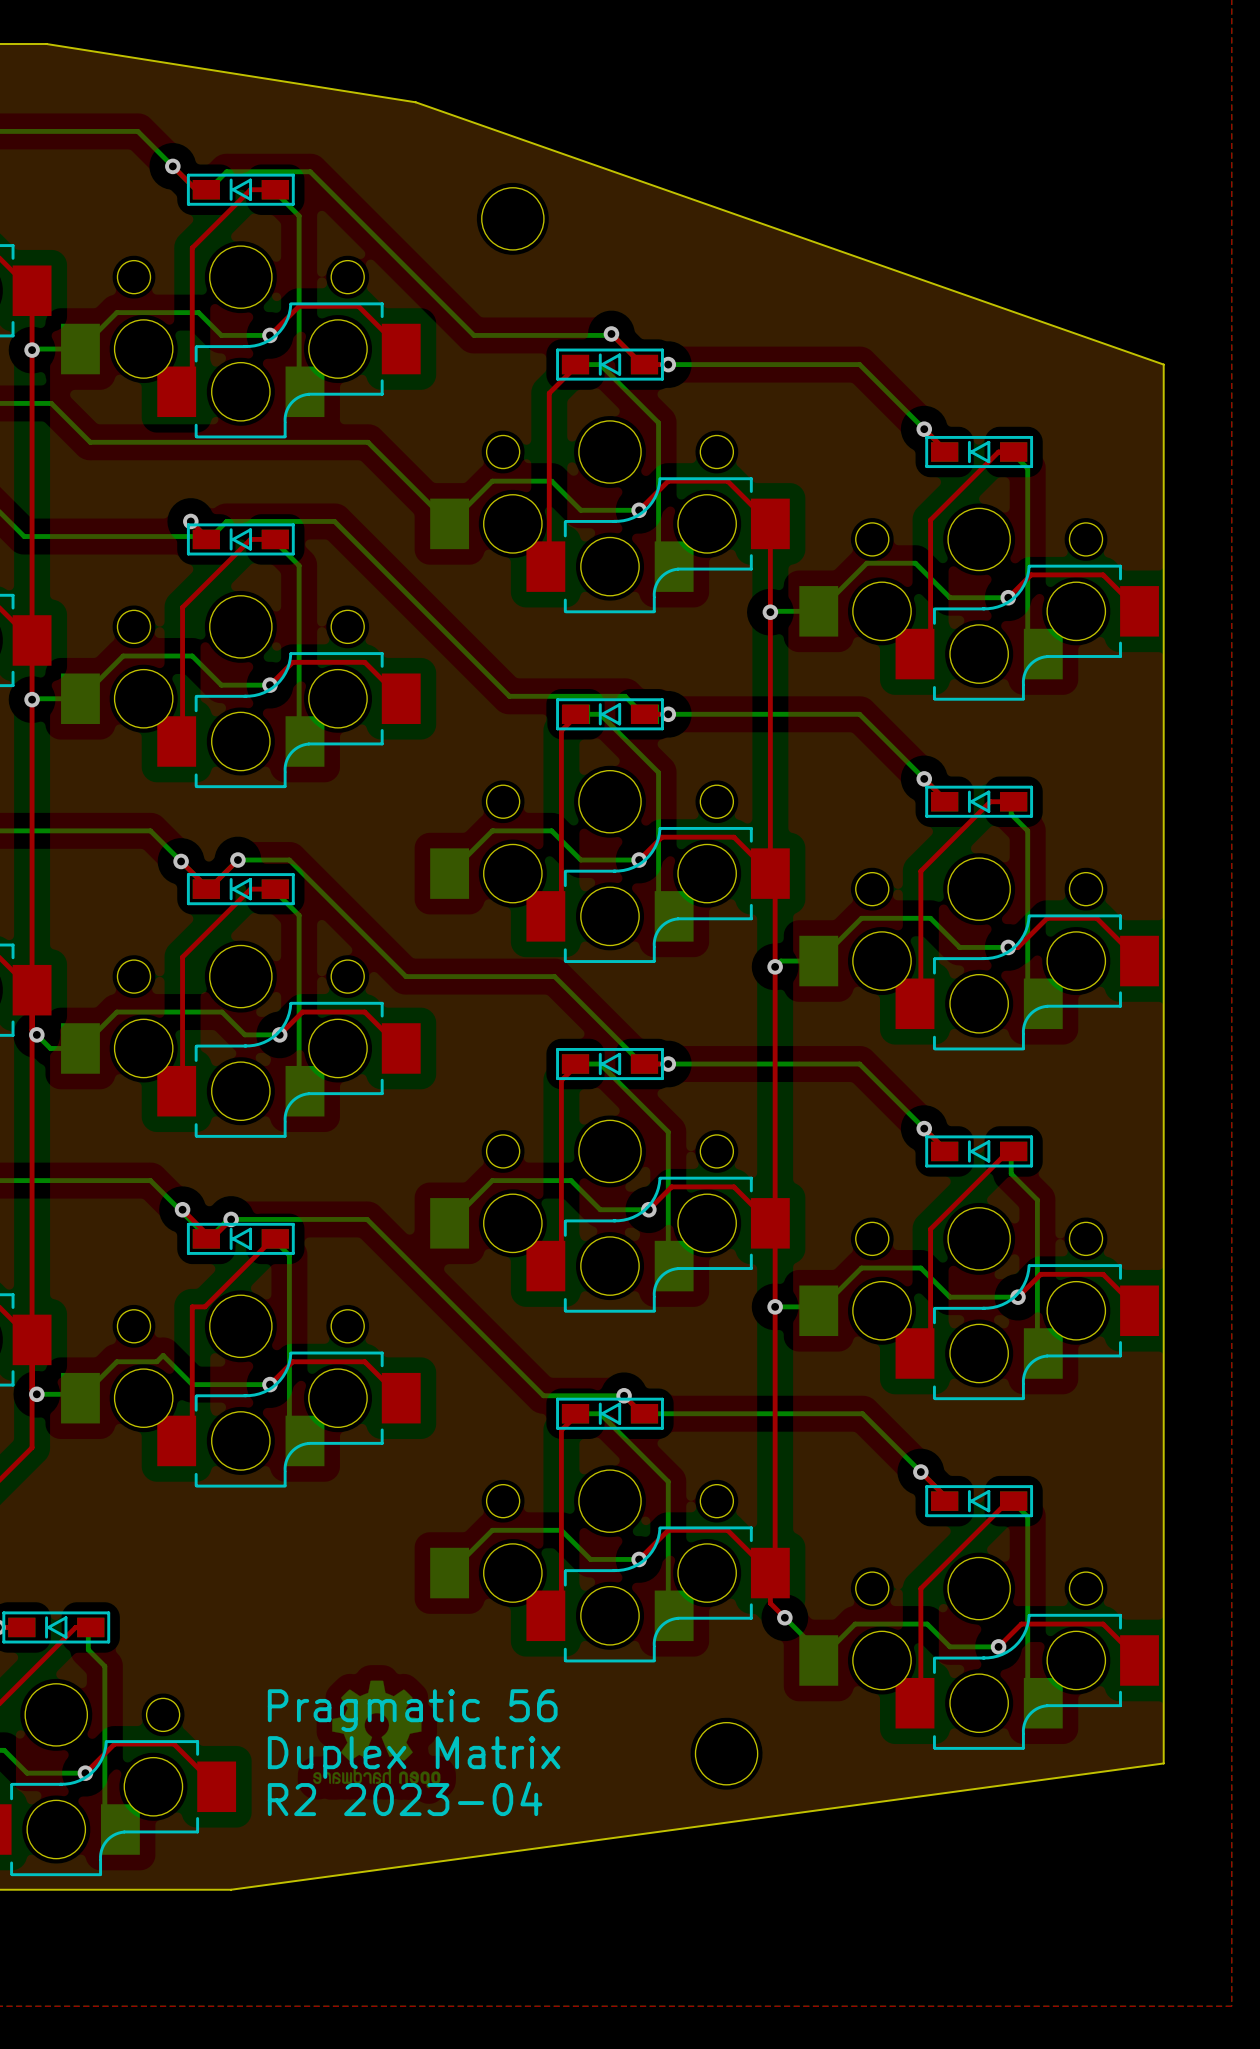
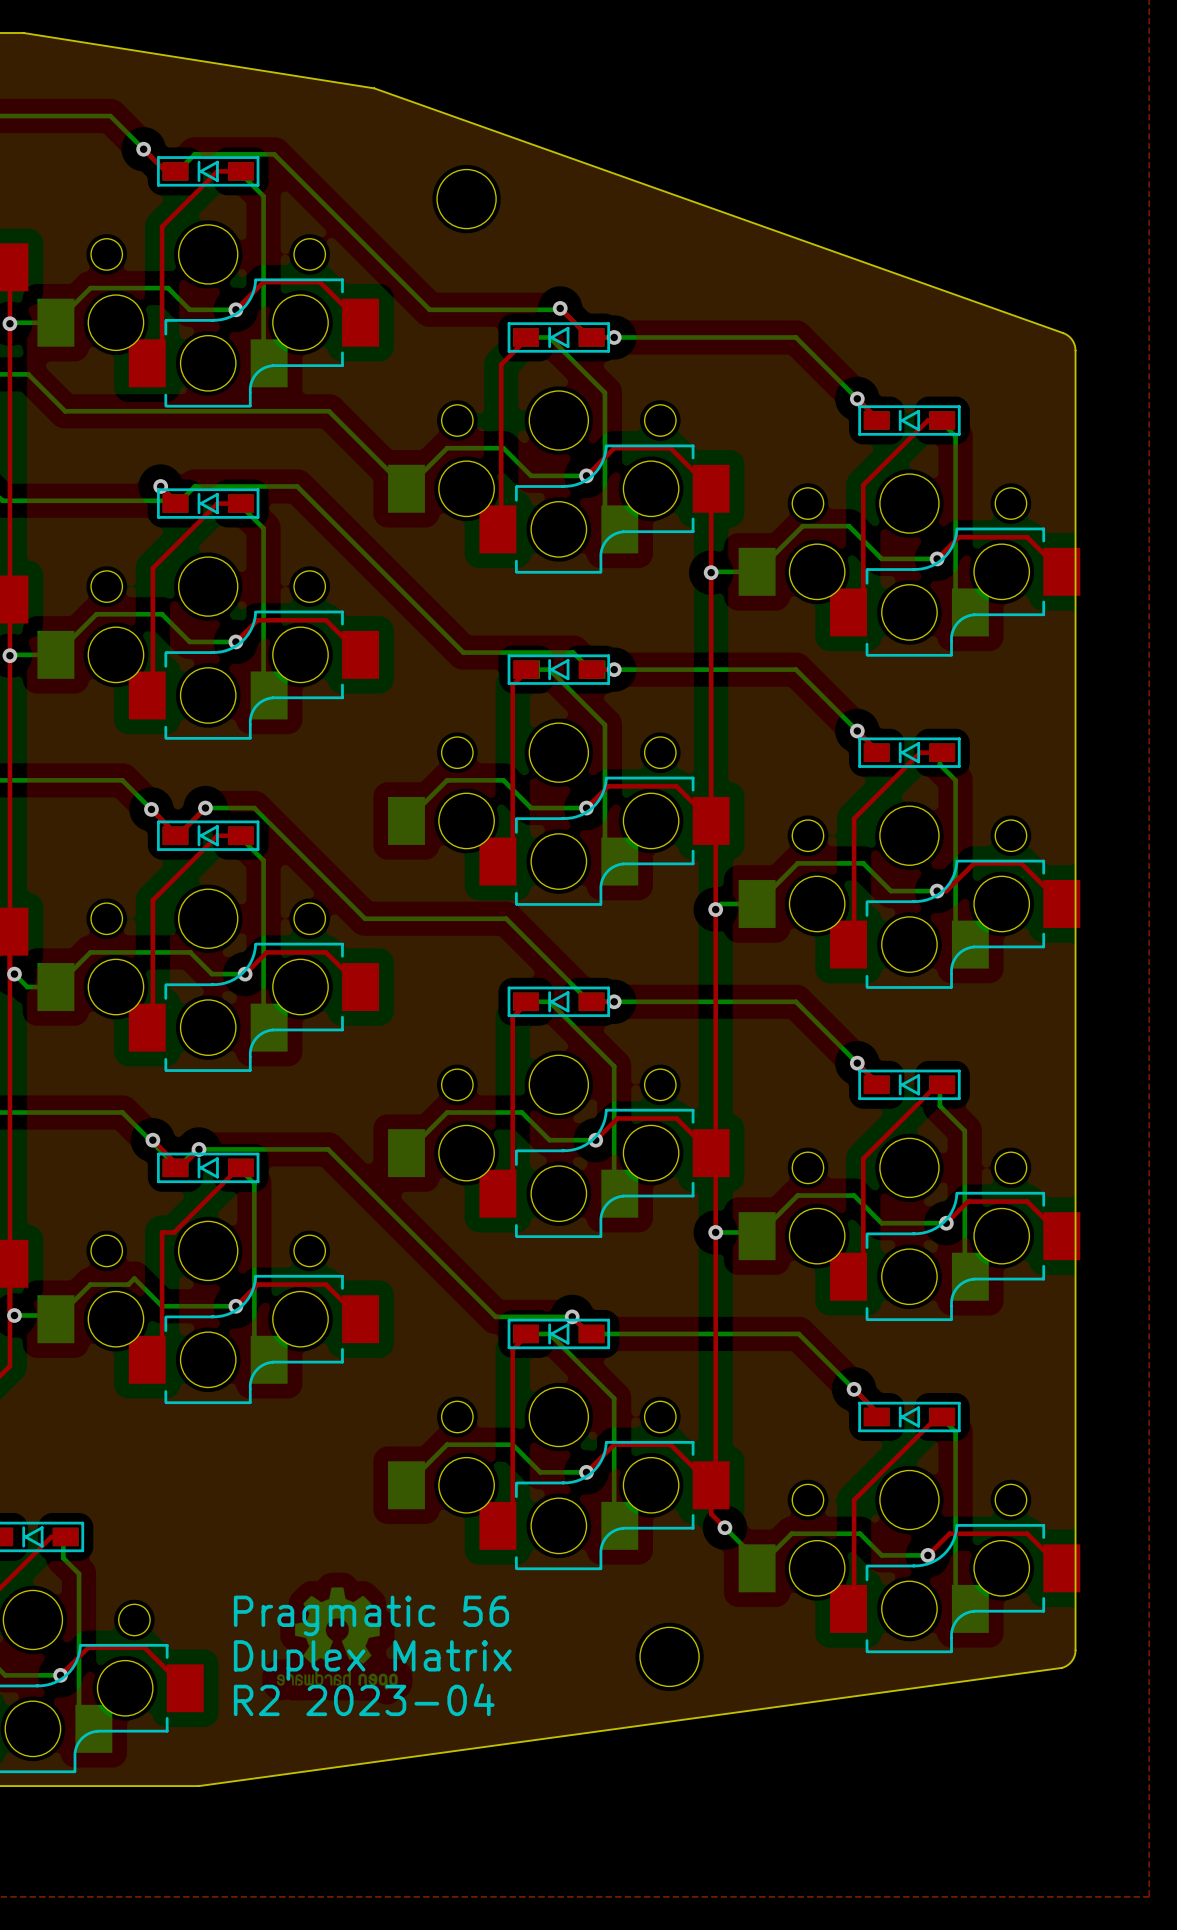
board edge: (415, 102) (1163, 364) (1163, 1763) (231, 1889) -> (374, 88) (1062, 332) (1070, 337) (1074, 343) (1075, 1652) (1070, 1663) (1061, 1667) (199, 1786)

